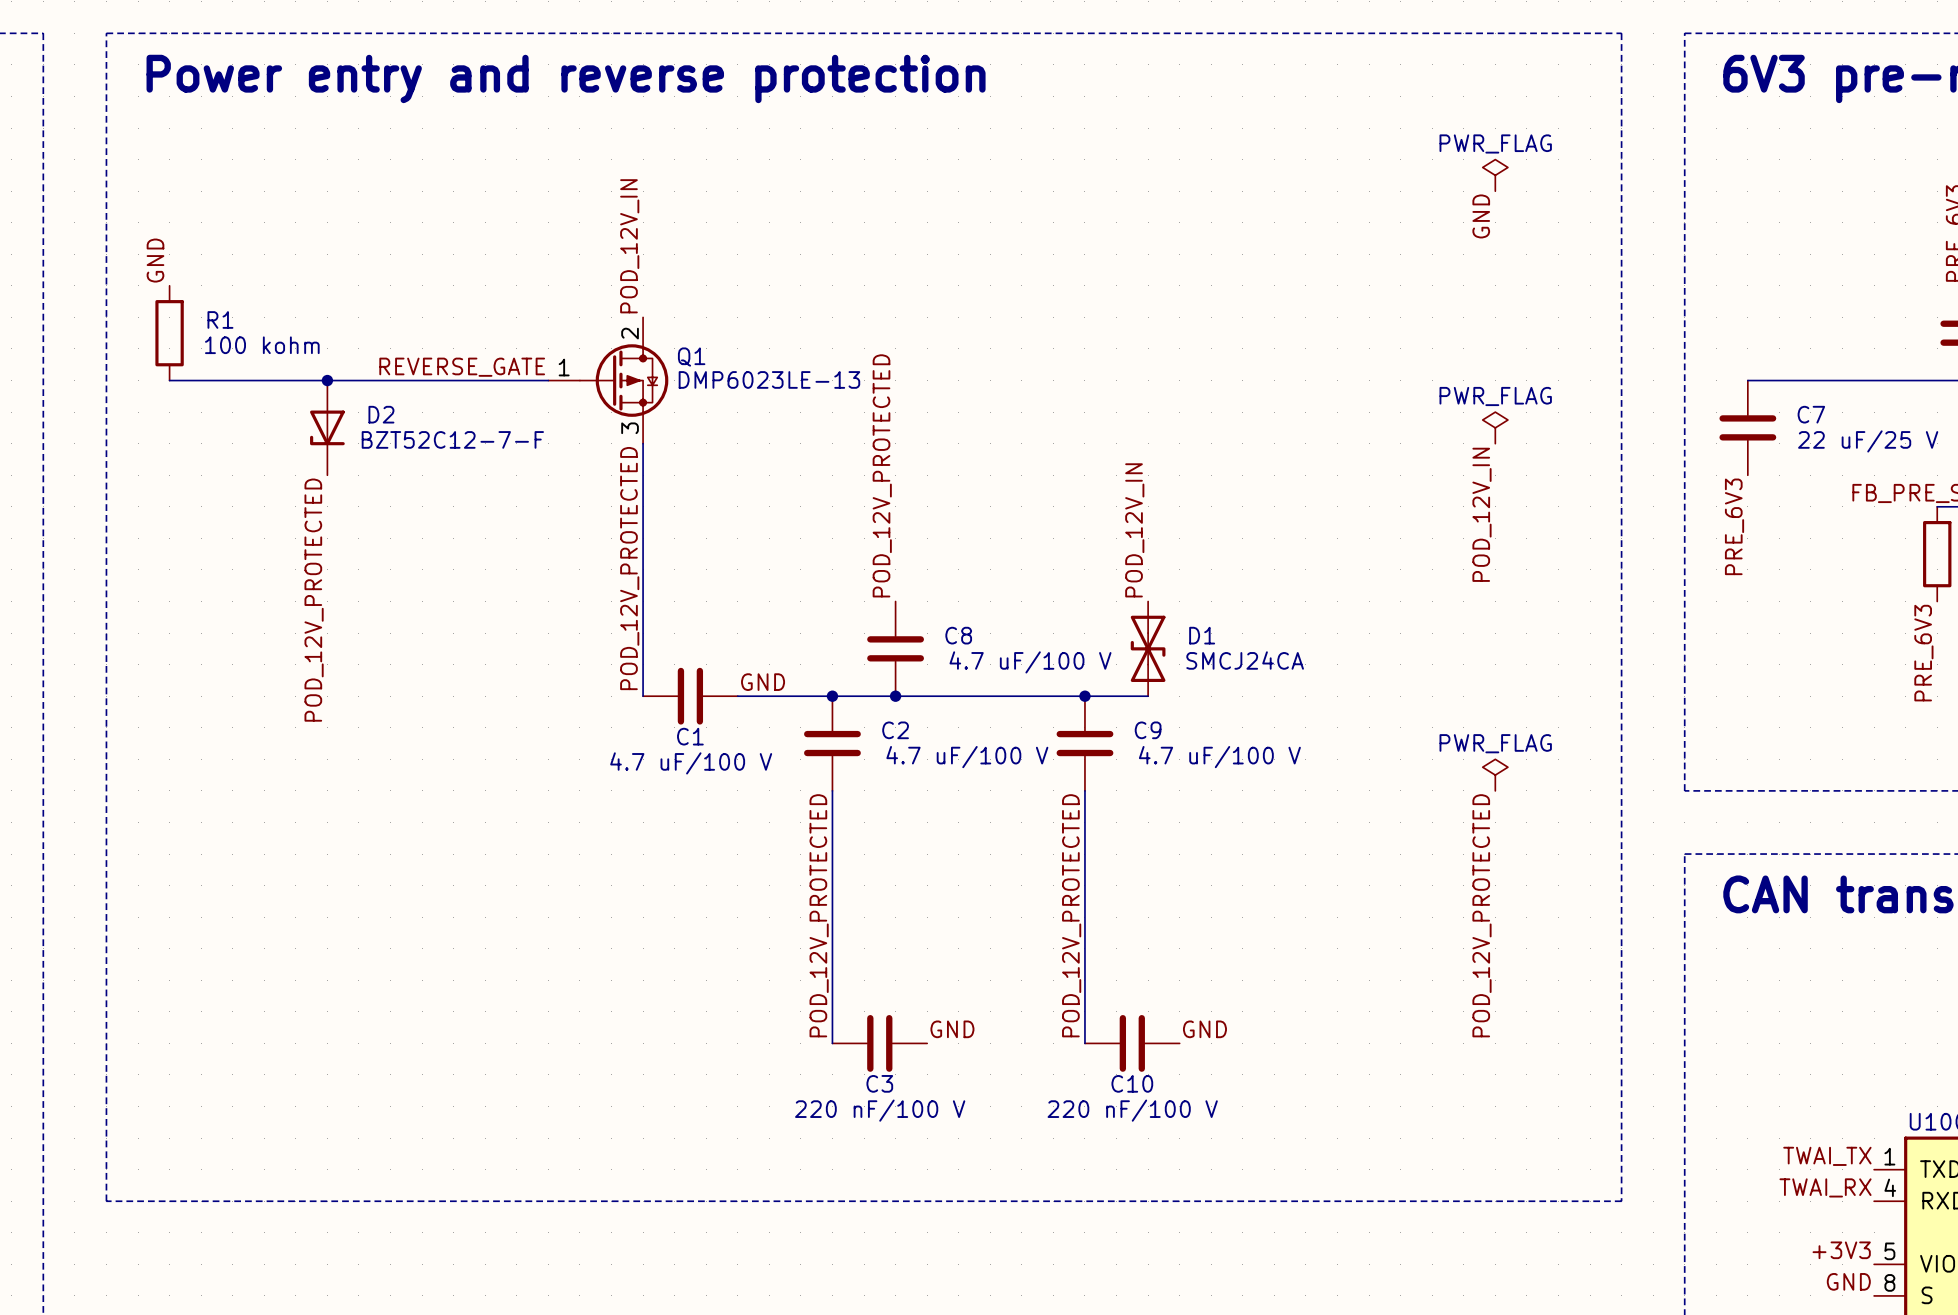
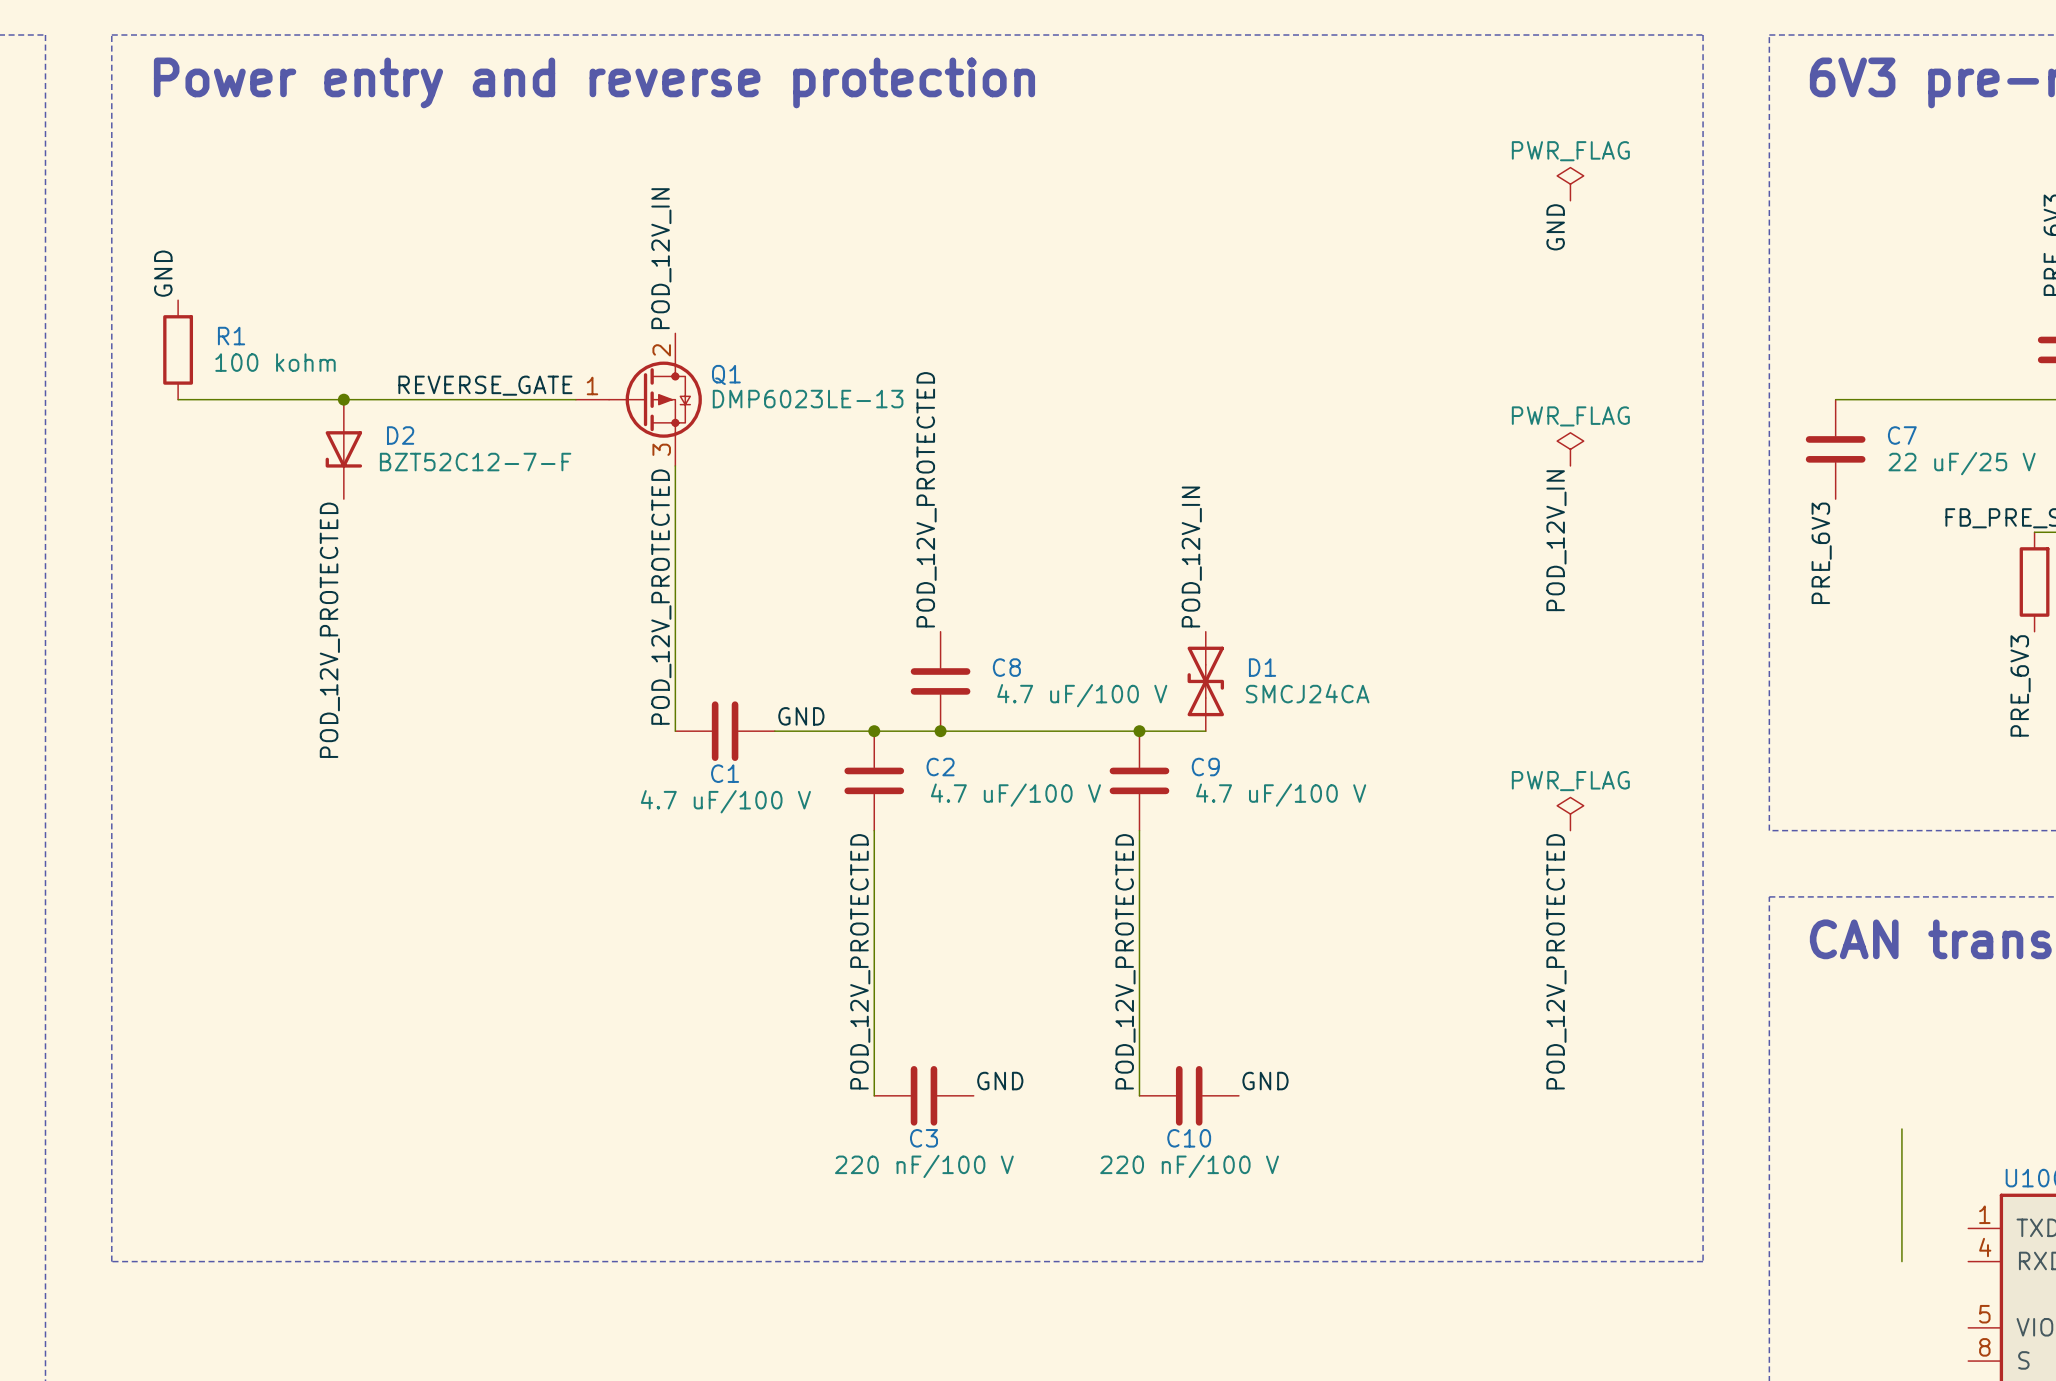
wire: none -> (1901, 1128) (1901, 1261)
label: TWAI_TX (1827, 1156) -> none
label: TWAI_RX (1825, 1187) -> none
label: +3V3 (1841, 1250) -> none
label: GND (1848, 1281) -> none

